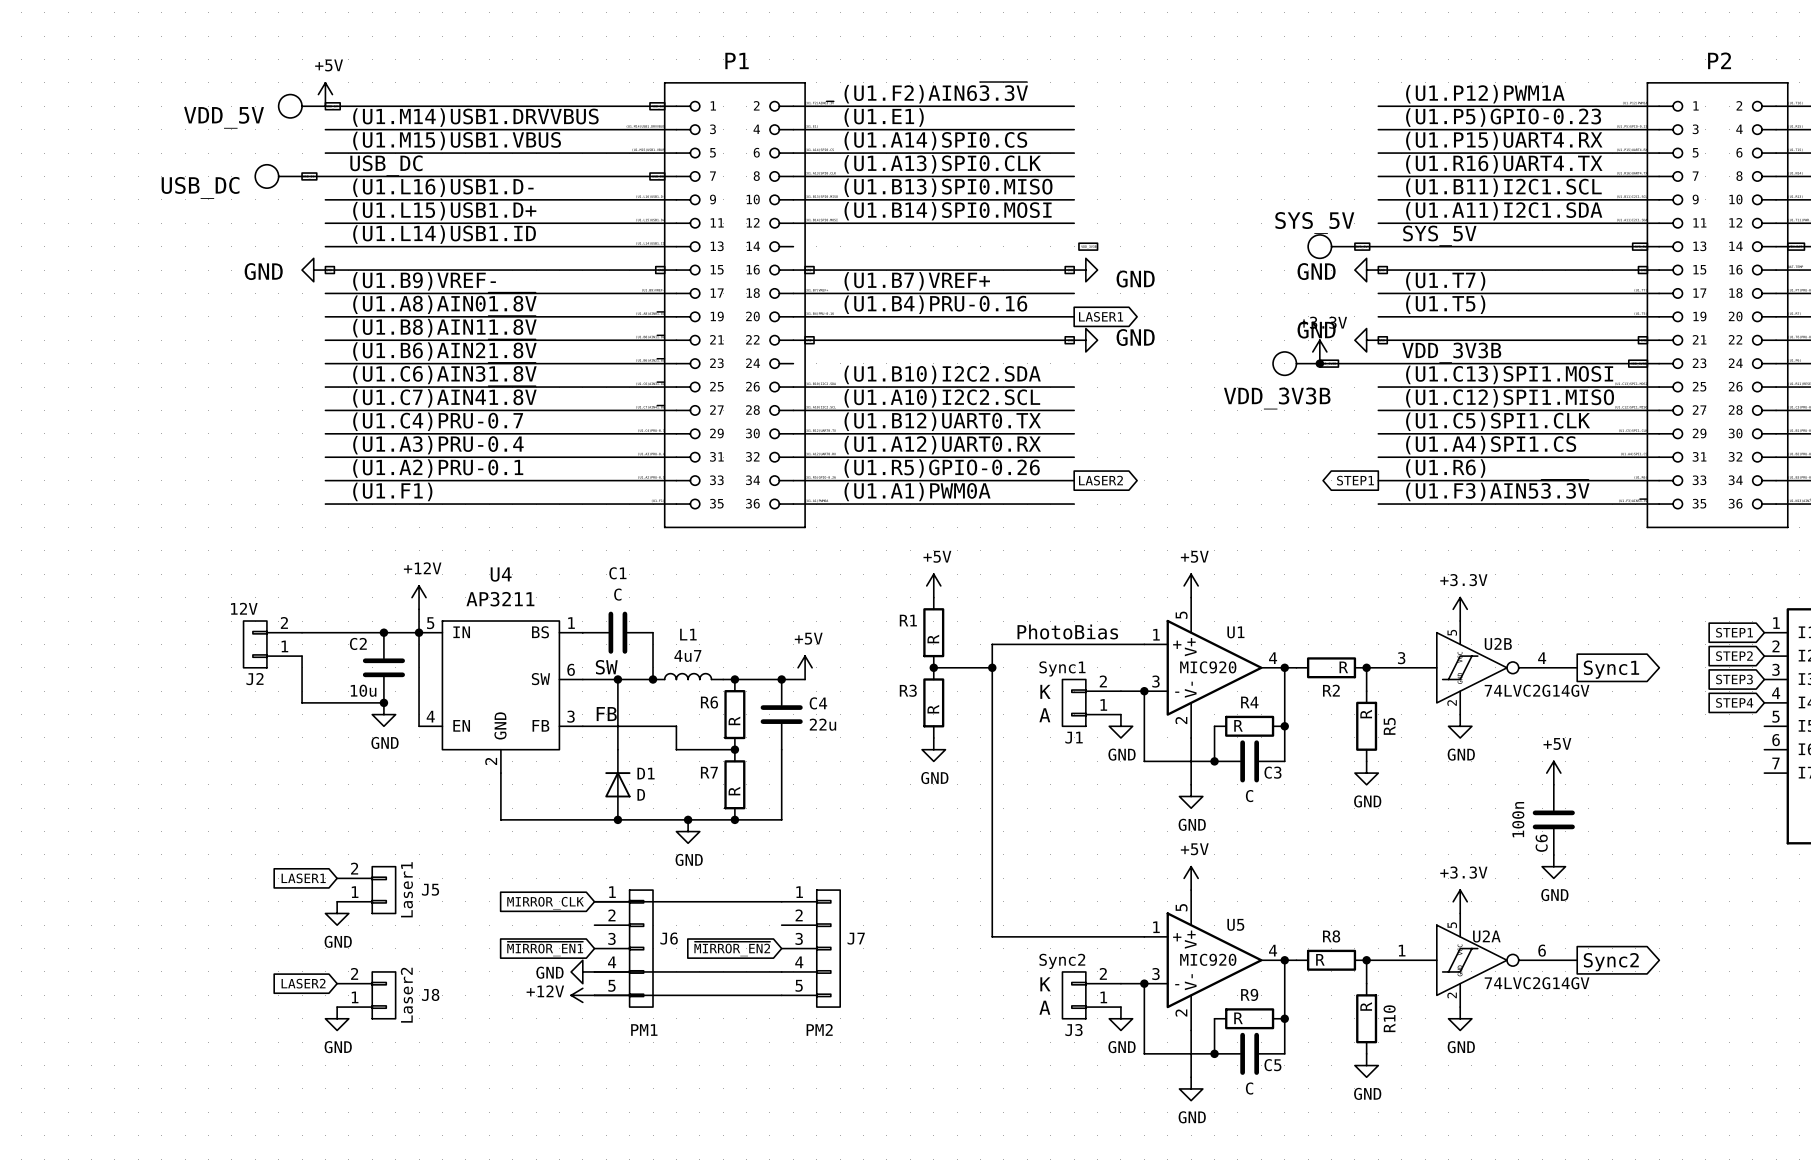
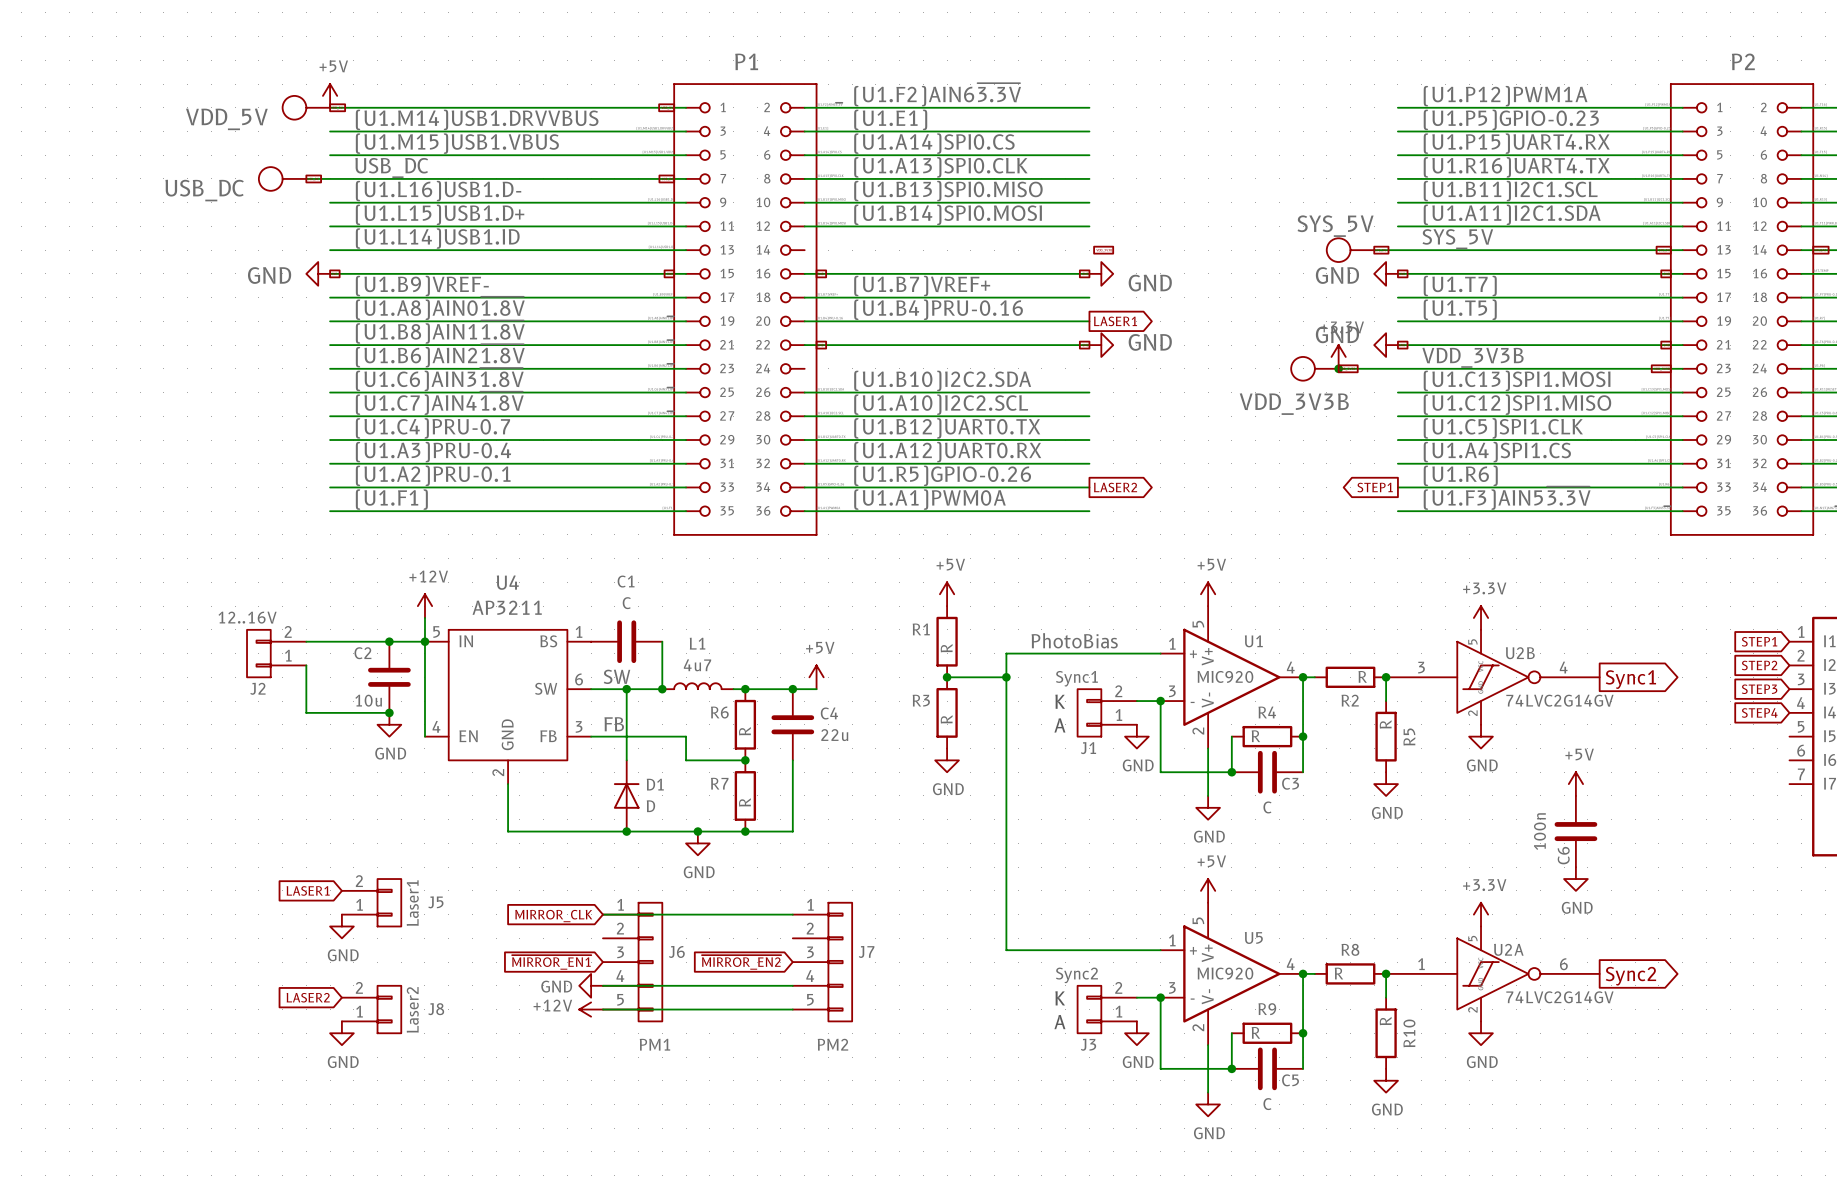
J2 value: 12V (244, 608) -> 12..16V (247, 617)

